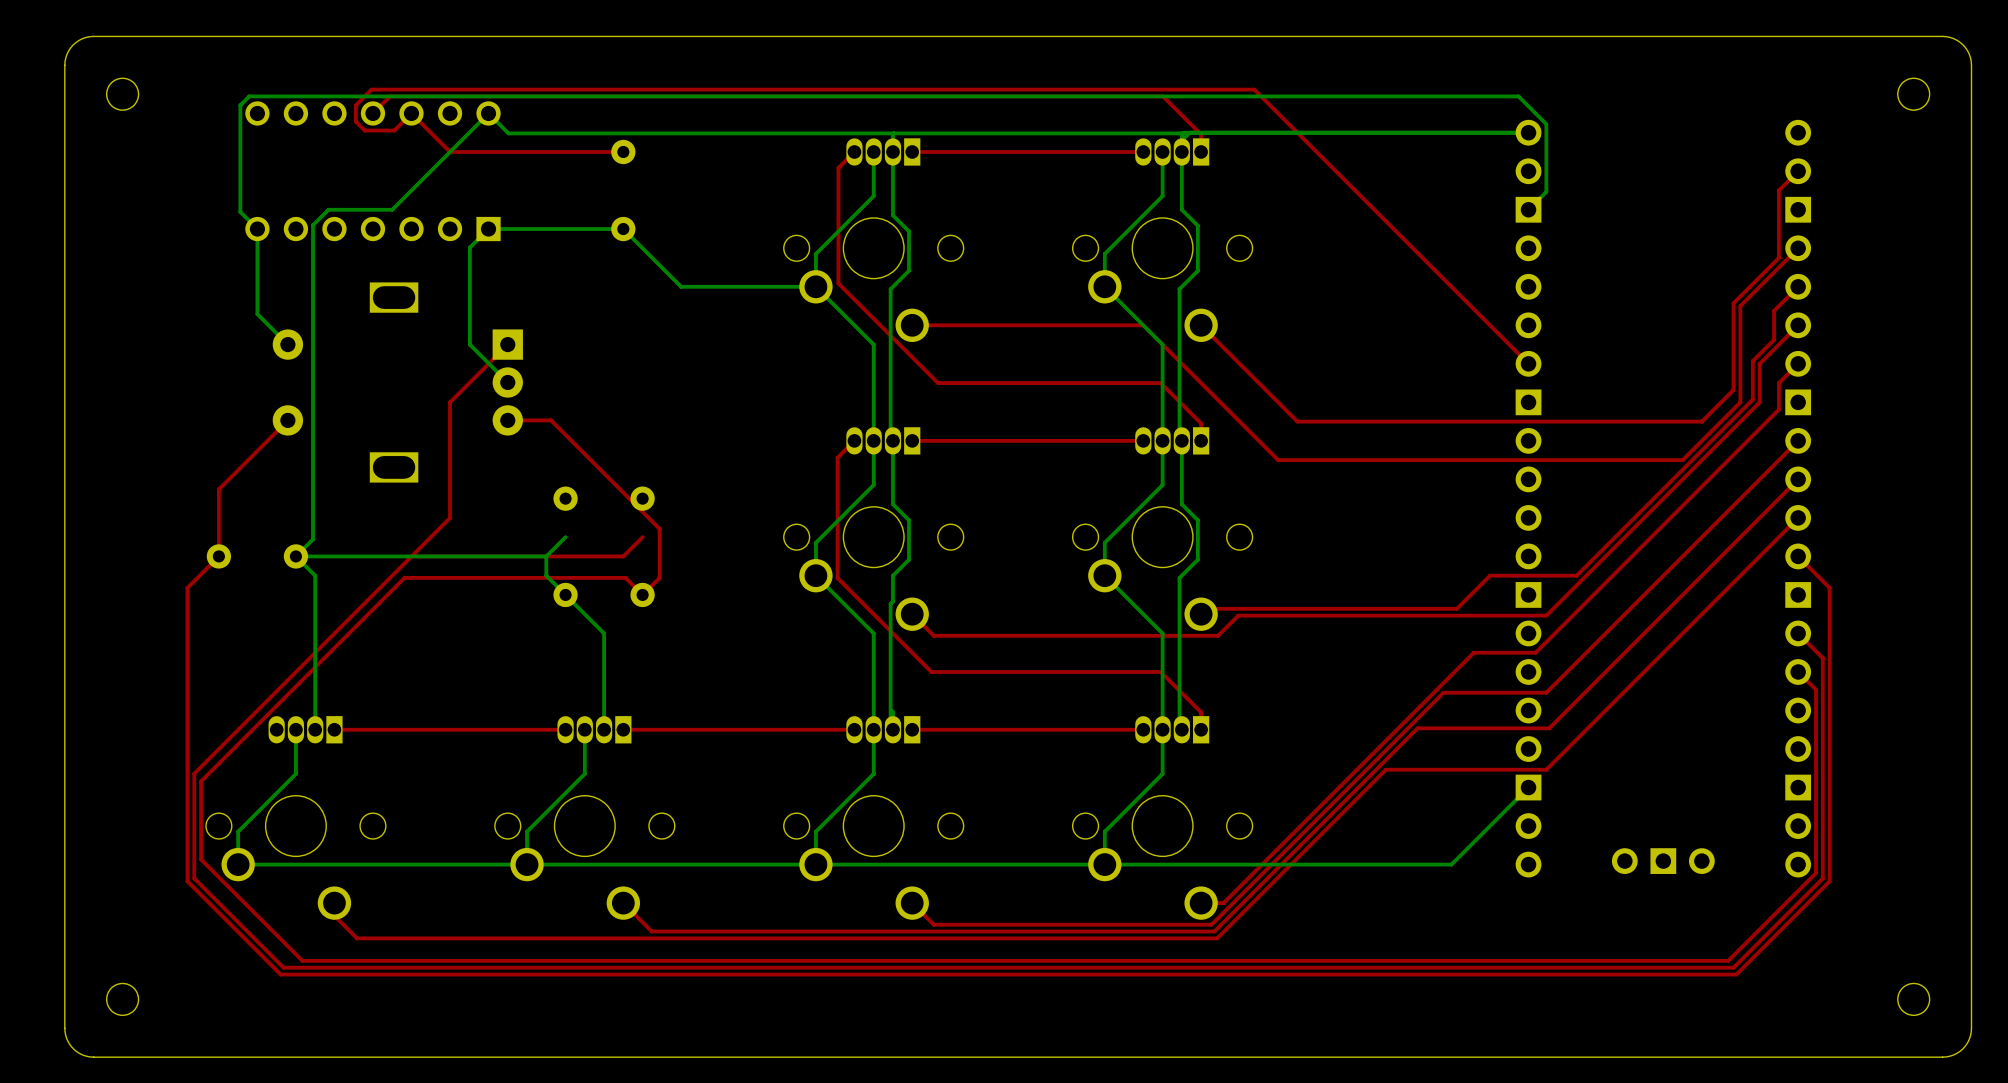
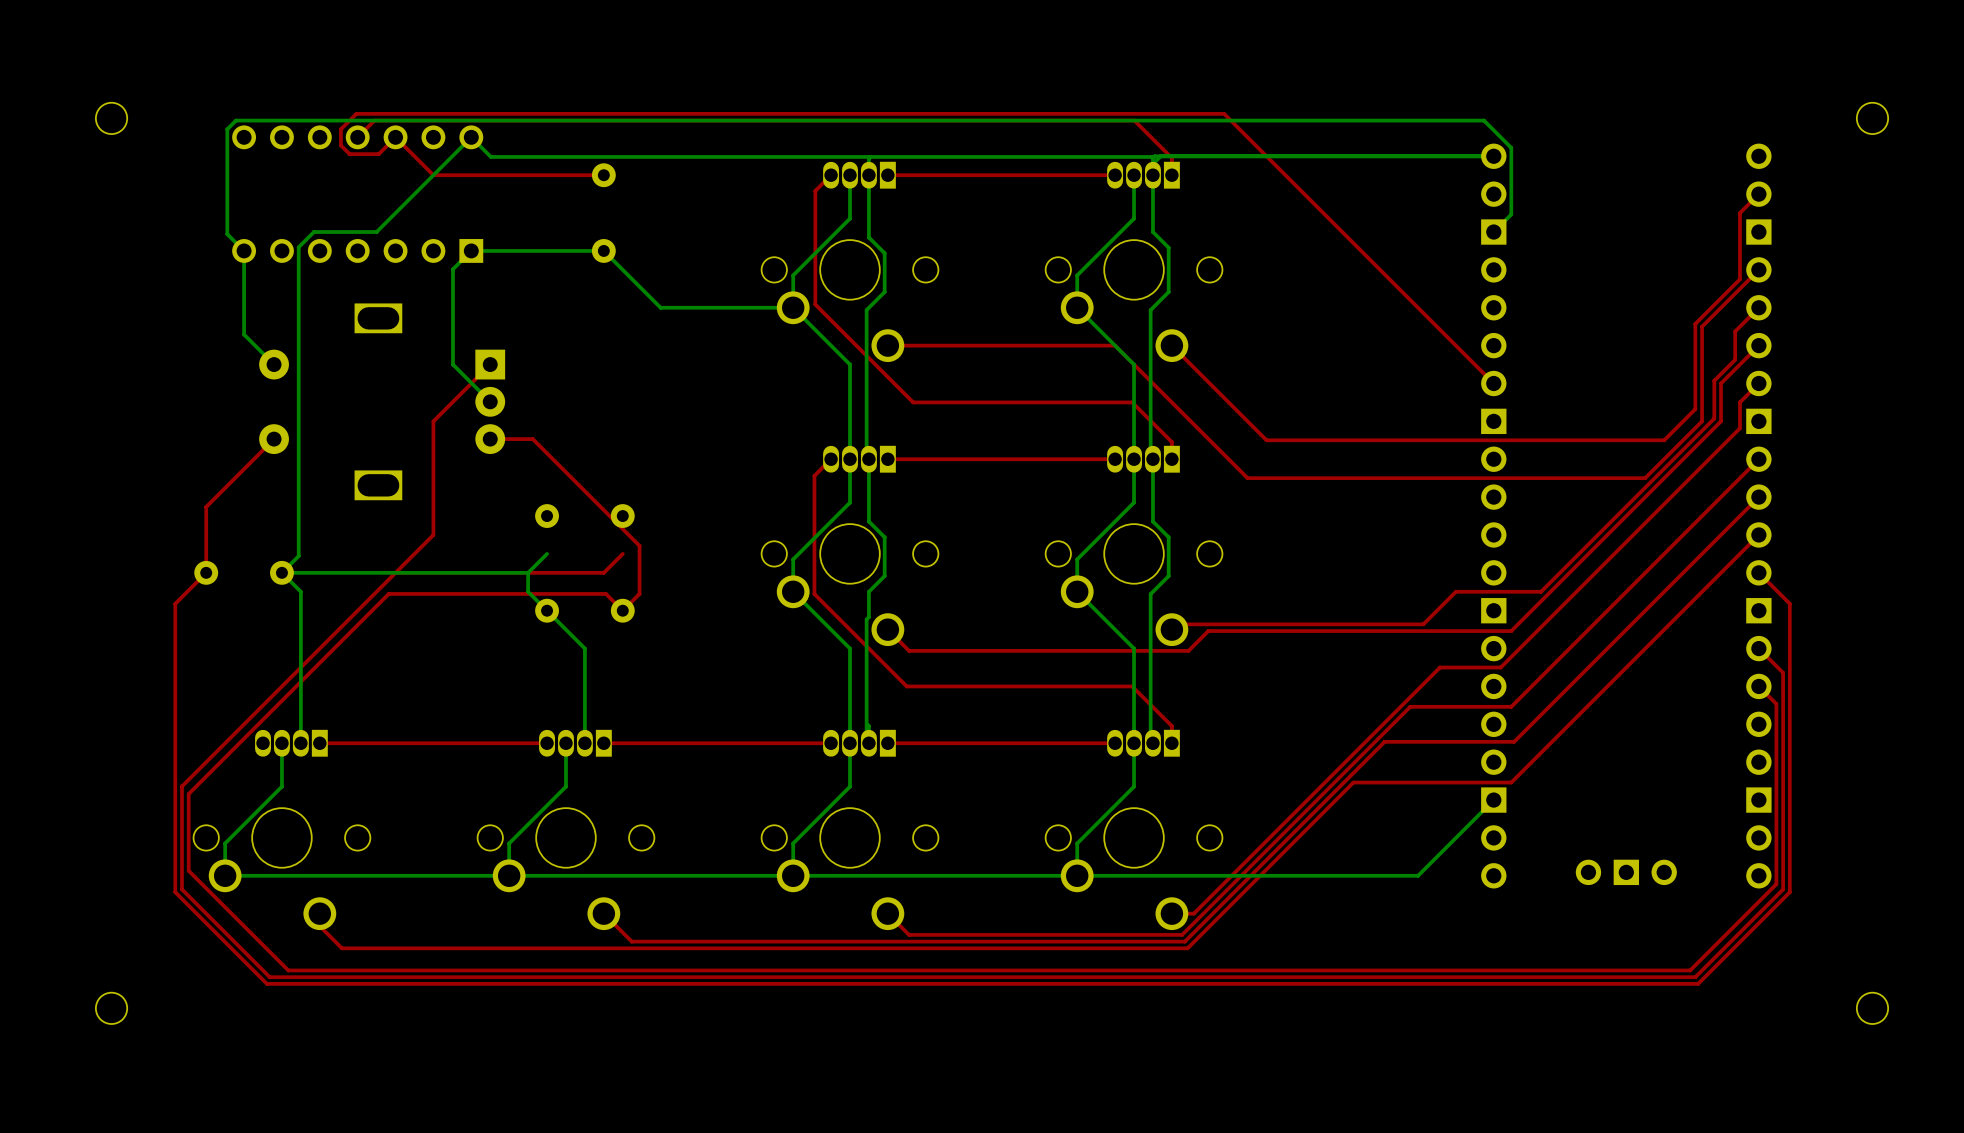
board edge: (1942, 36) (93, 36) (79, 40) (68, 50) (64, 65) (64, 1028) (68, 1042) (79, 1053) (93, 1057) (1942, 1057) (1957, 1053) (1967, 1042) (1971, 1028) (1971, 65) (1969, 54) (1963, 44) (1953, 38) (1942, 36) -> none

